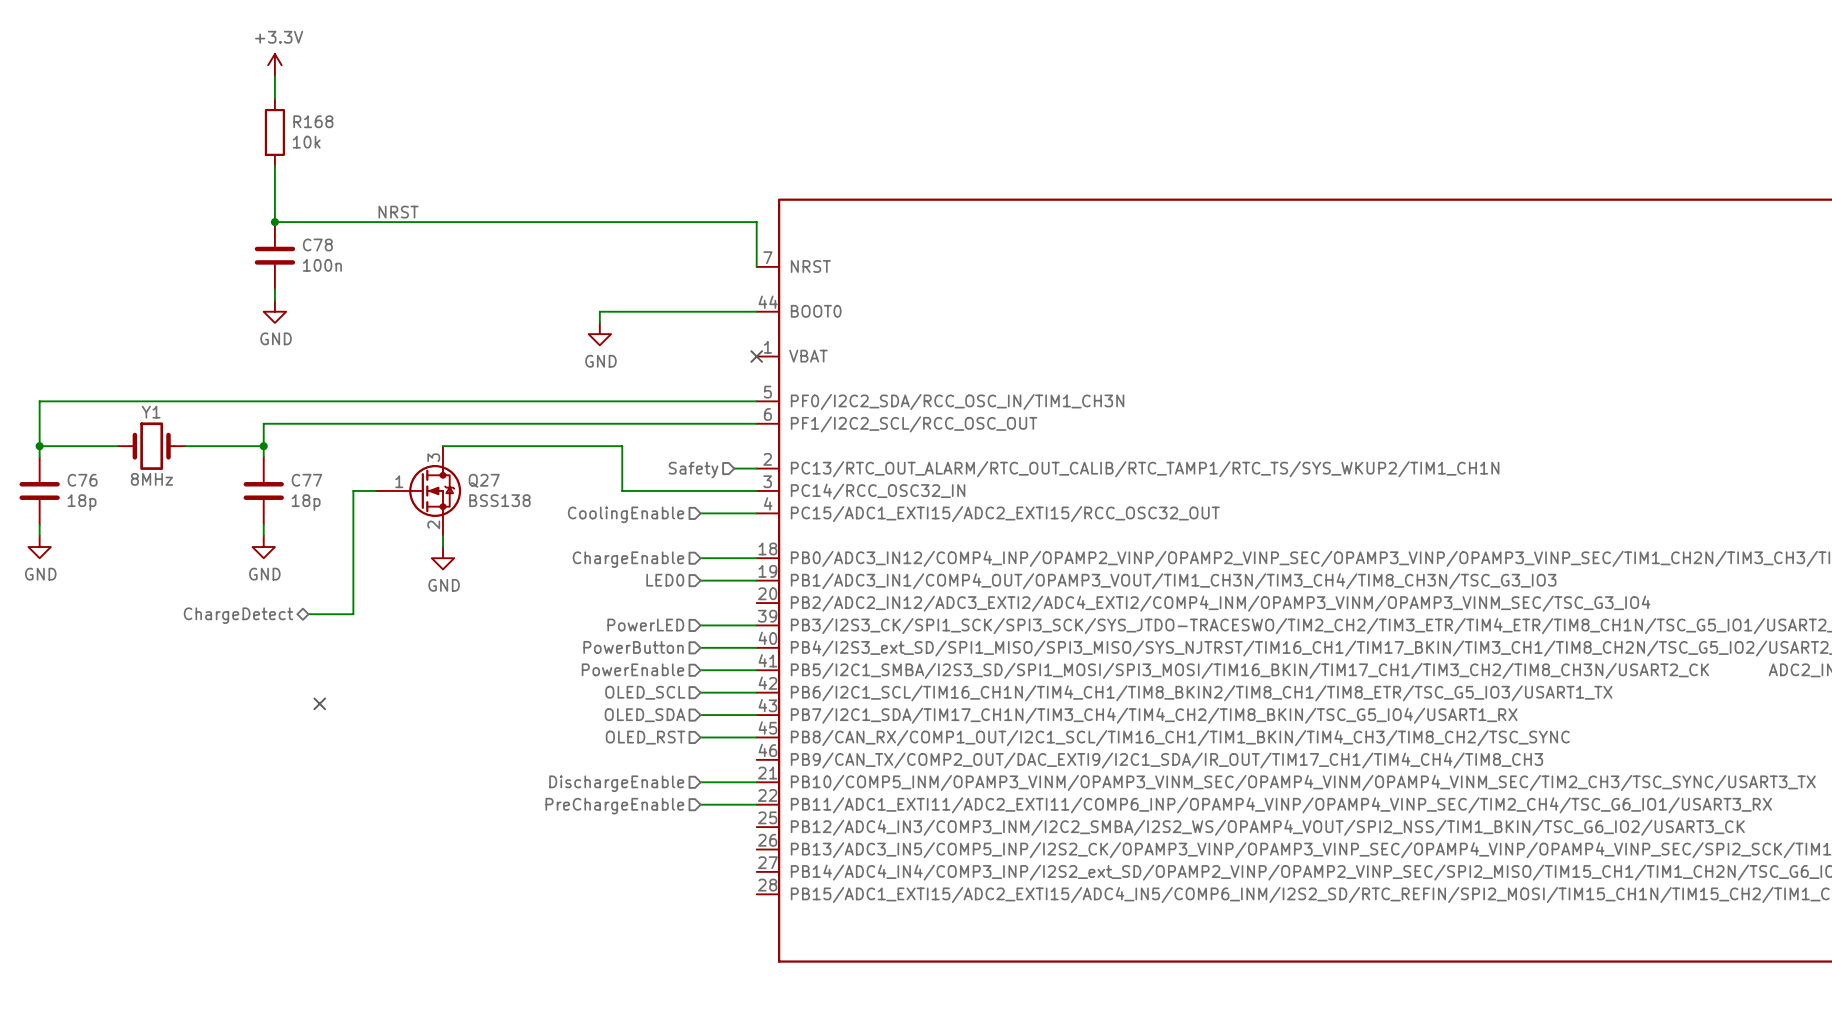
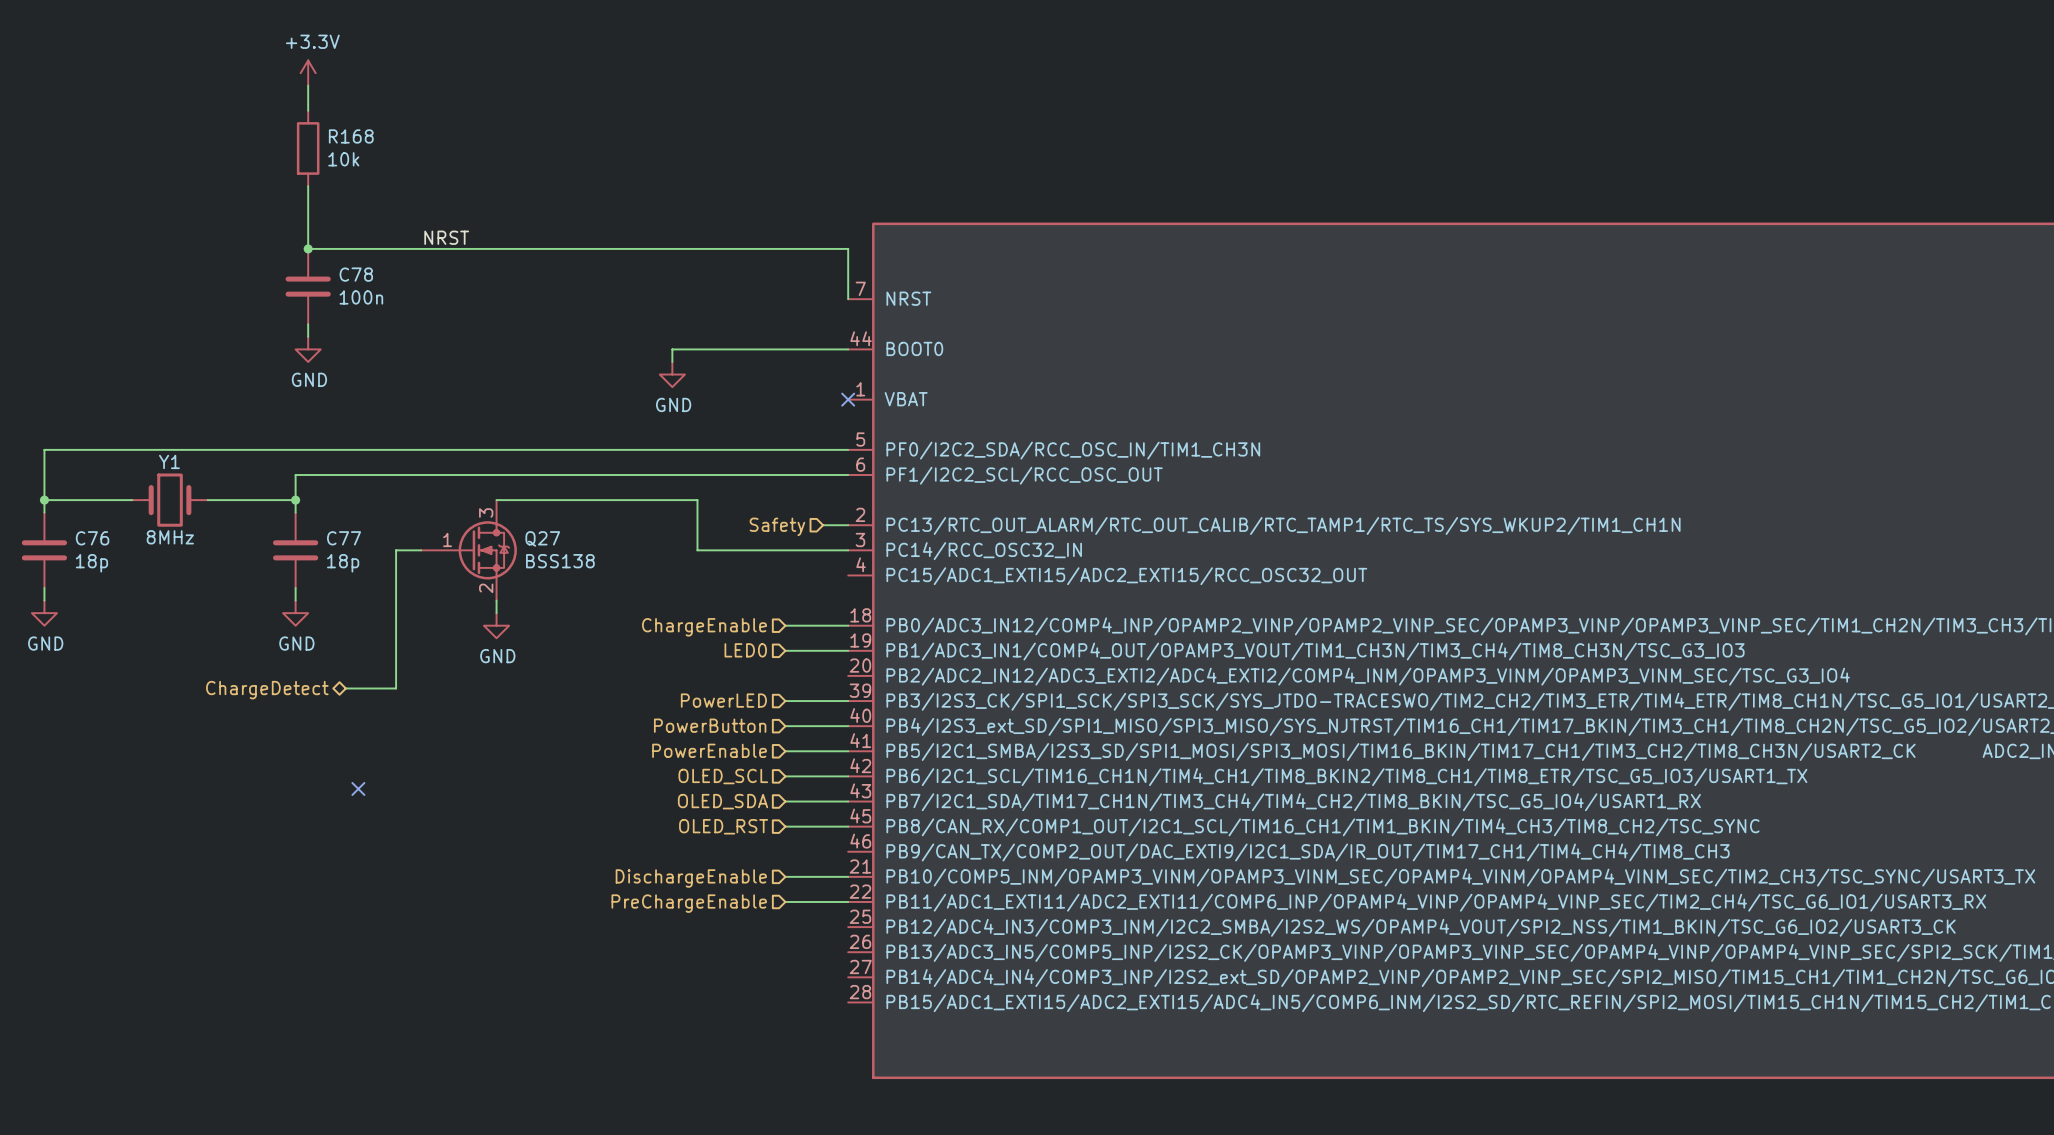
wire: (700, 513) (756, 513) -> none
hierarchical label: CoolingEnable (626, 514) -> none

